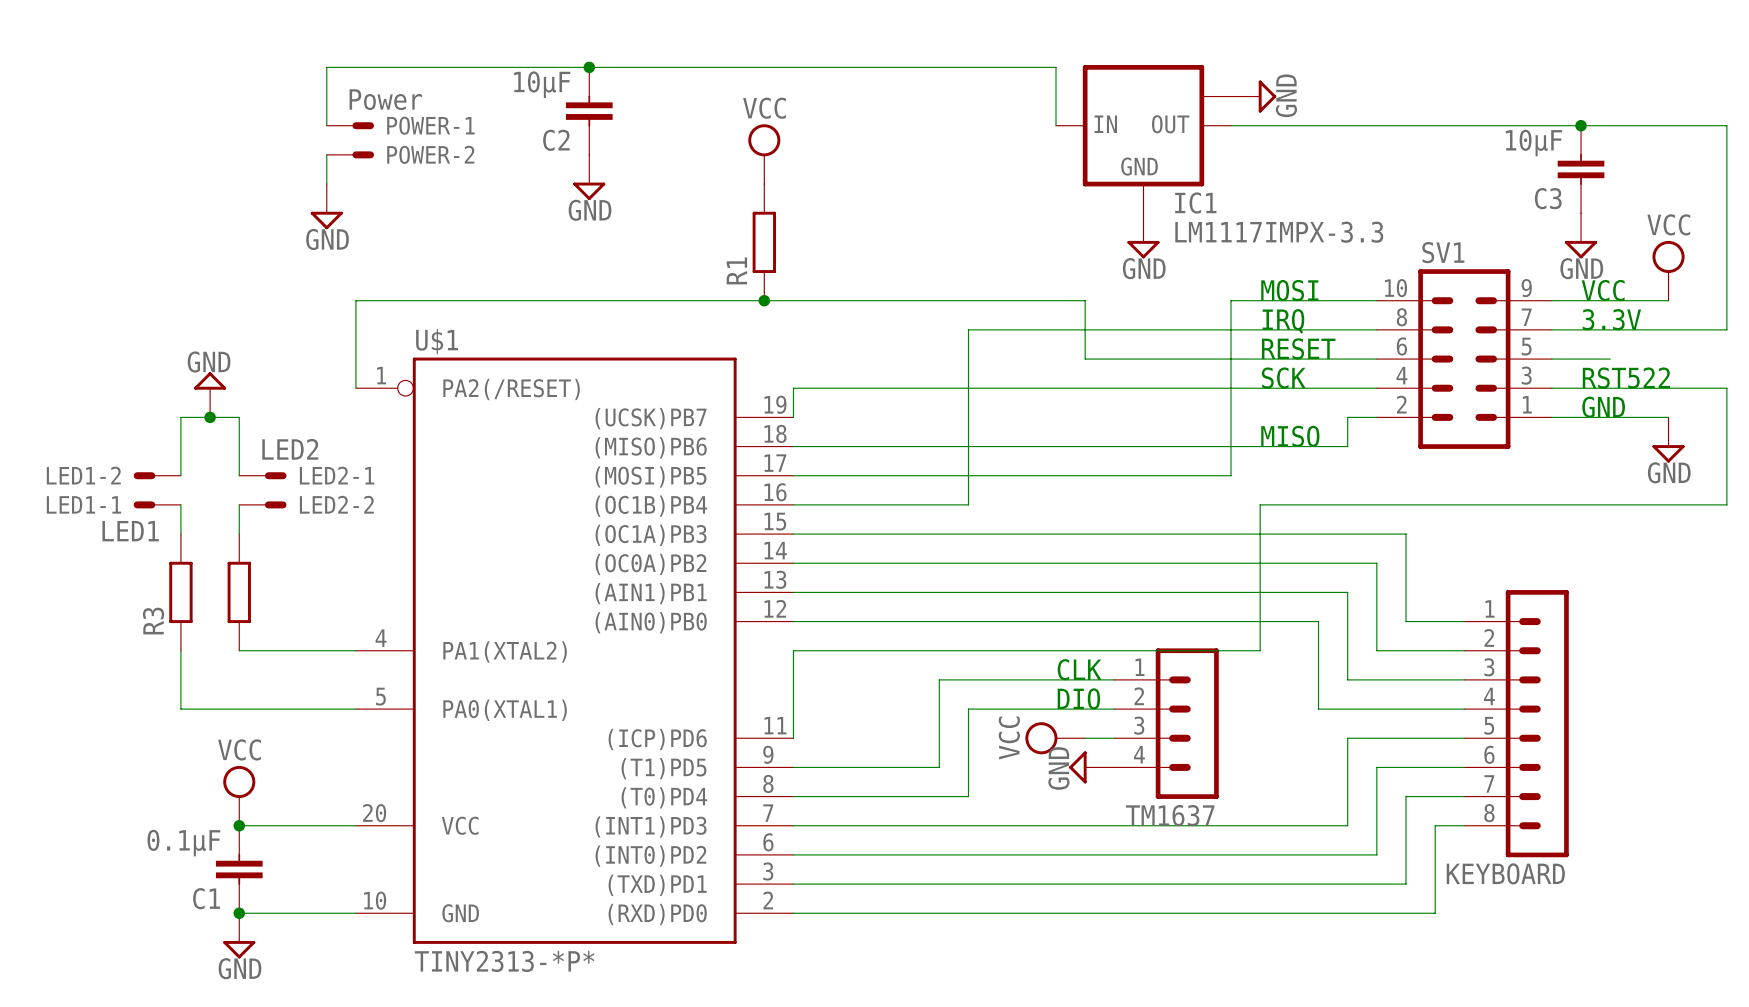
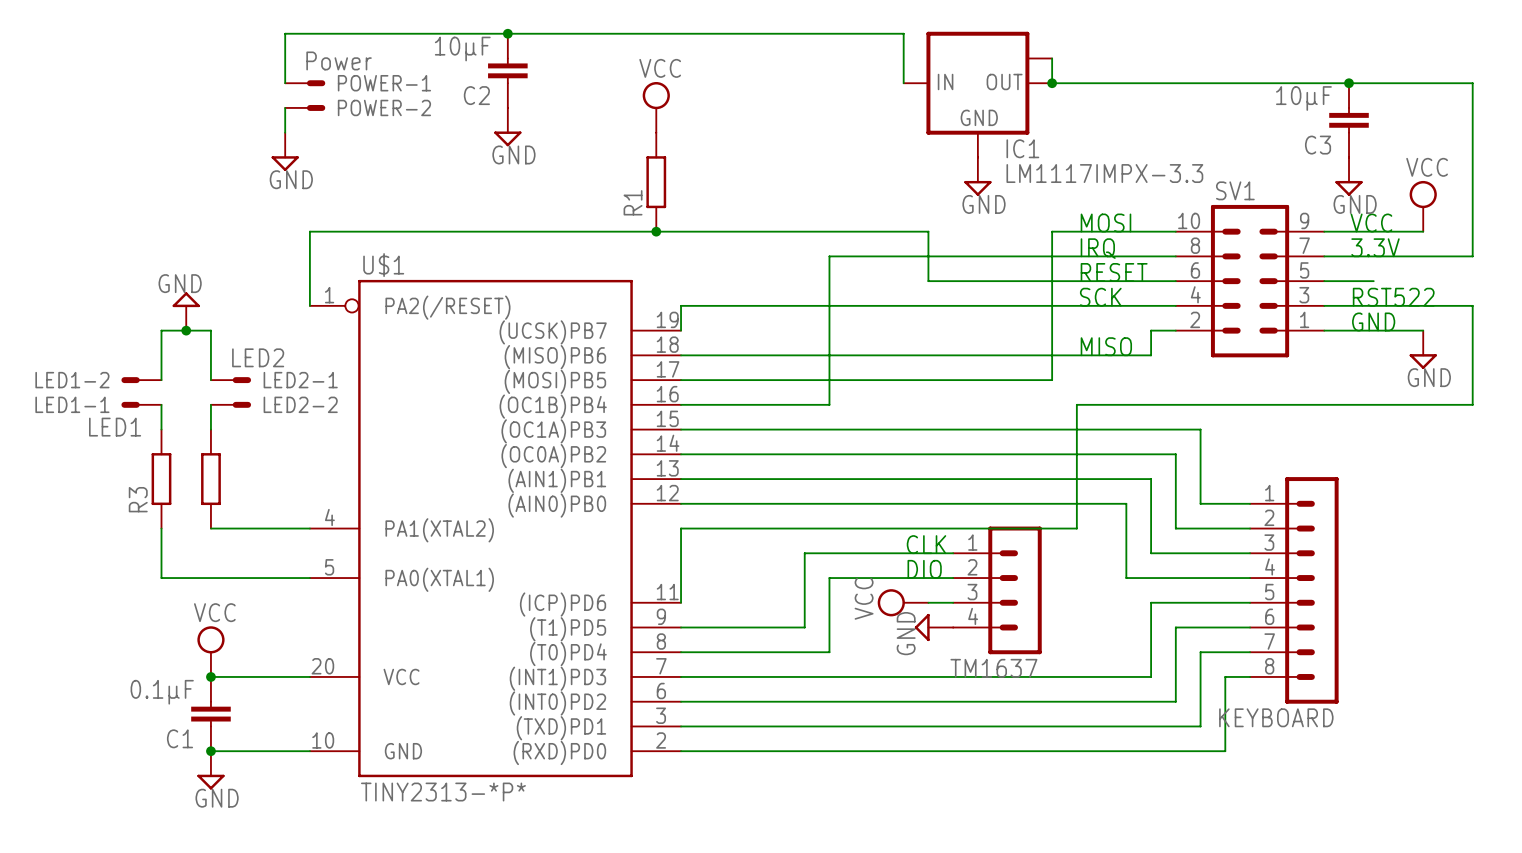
wire: none -> (1052, 58) (1052, 83)
power symbol: GND (1253, 96) -> none
junction: none -> (1052, 83)

